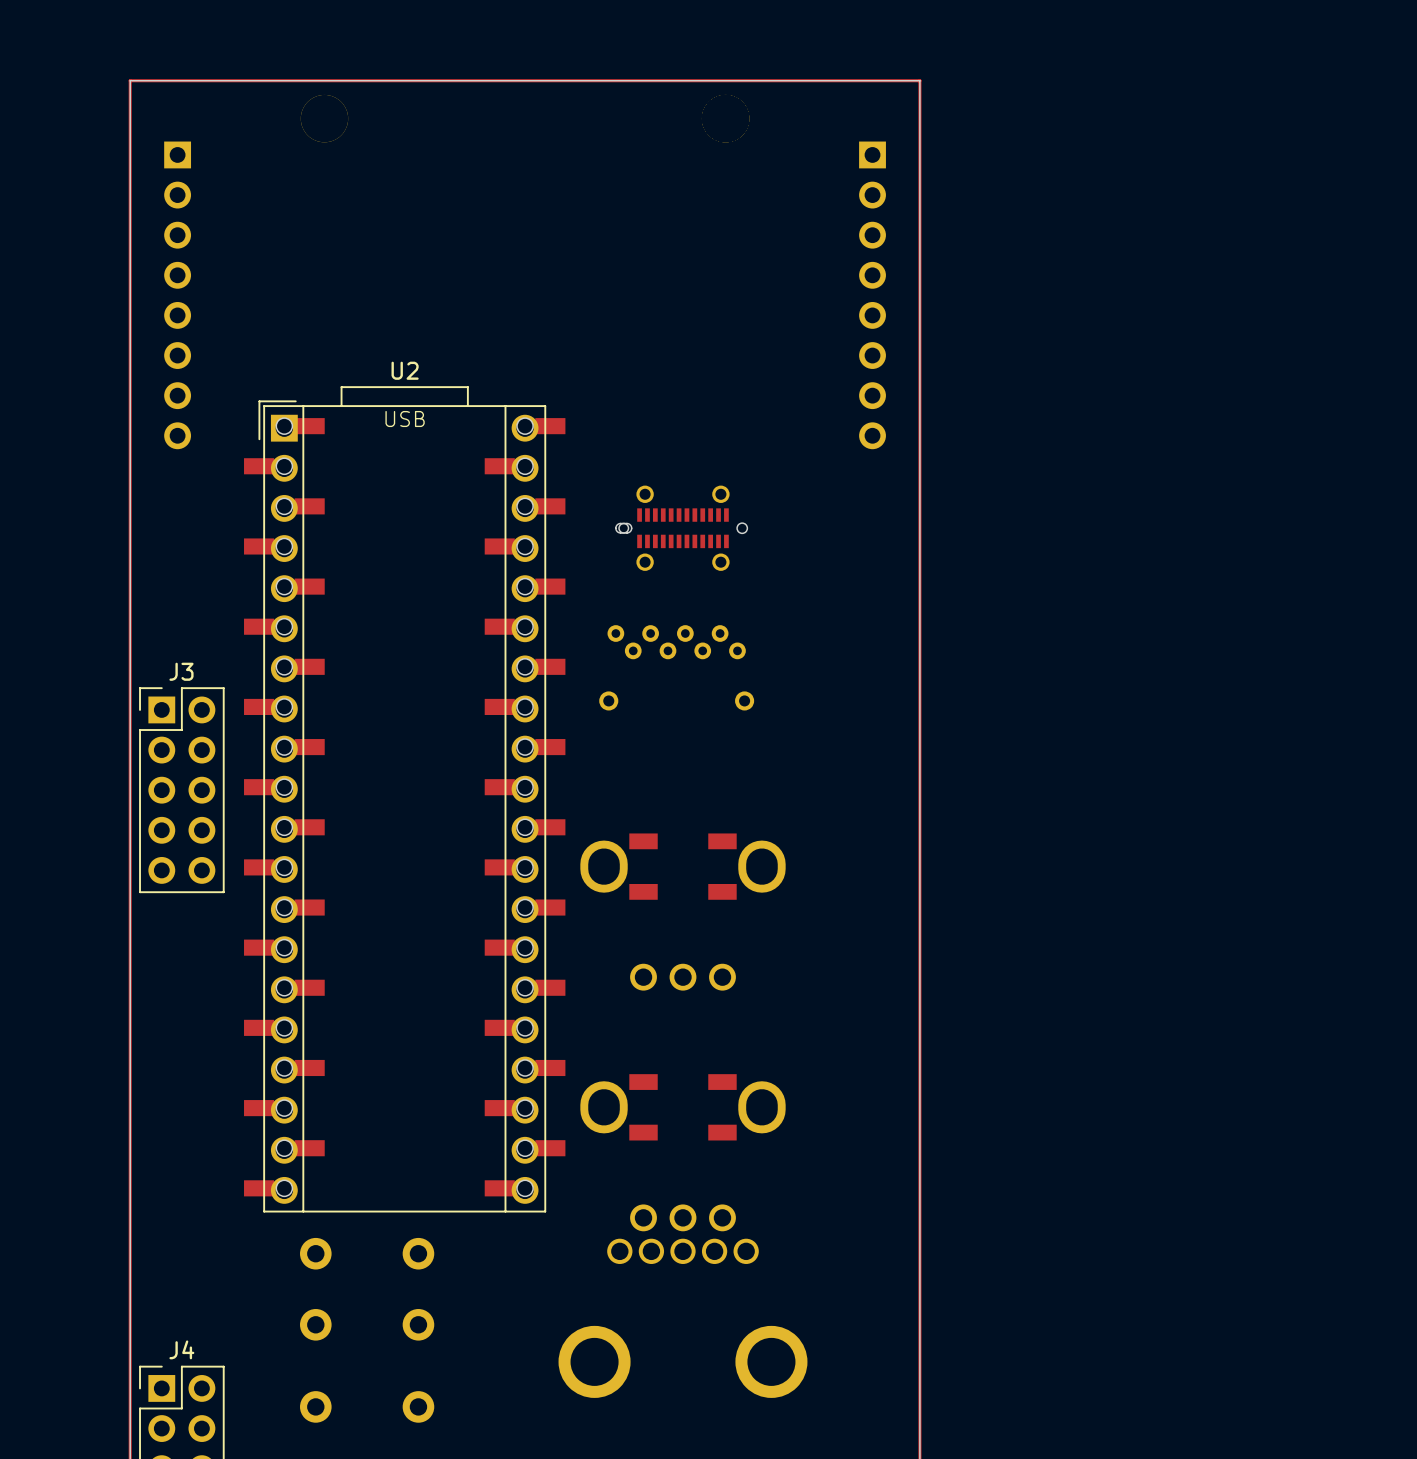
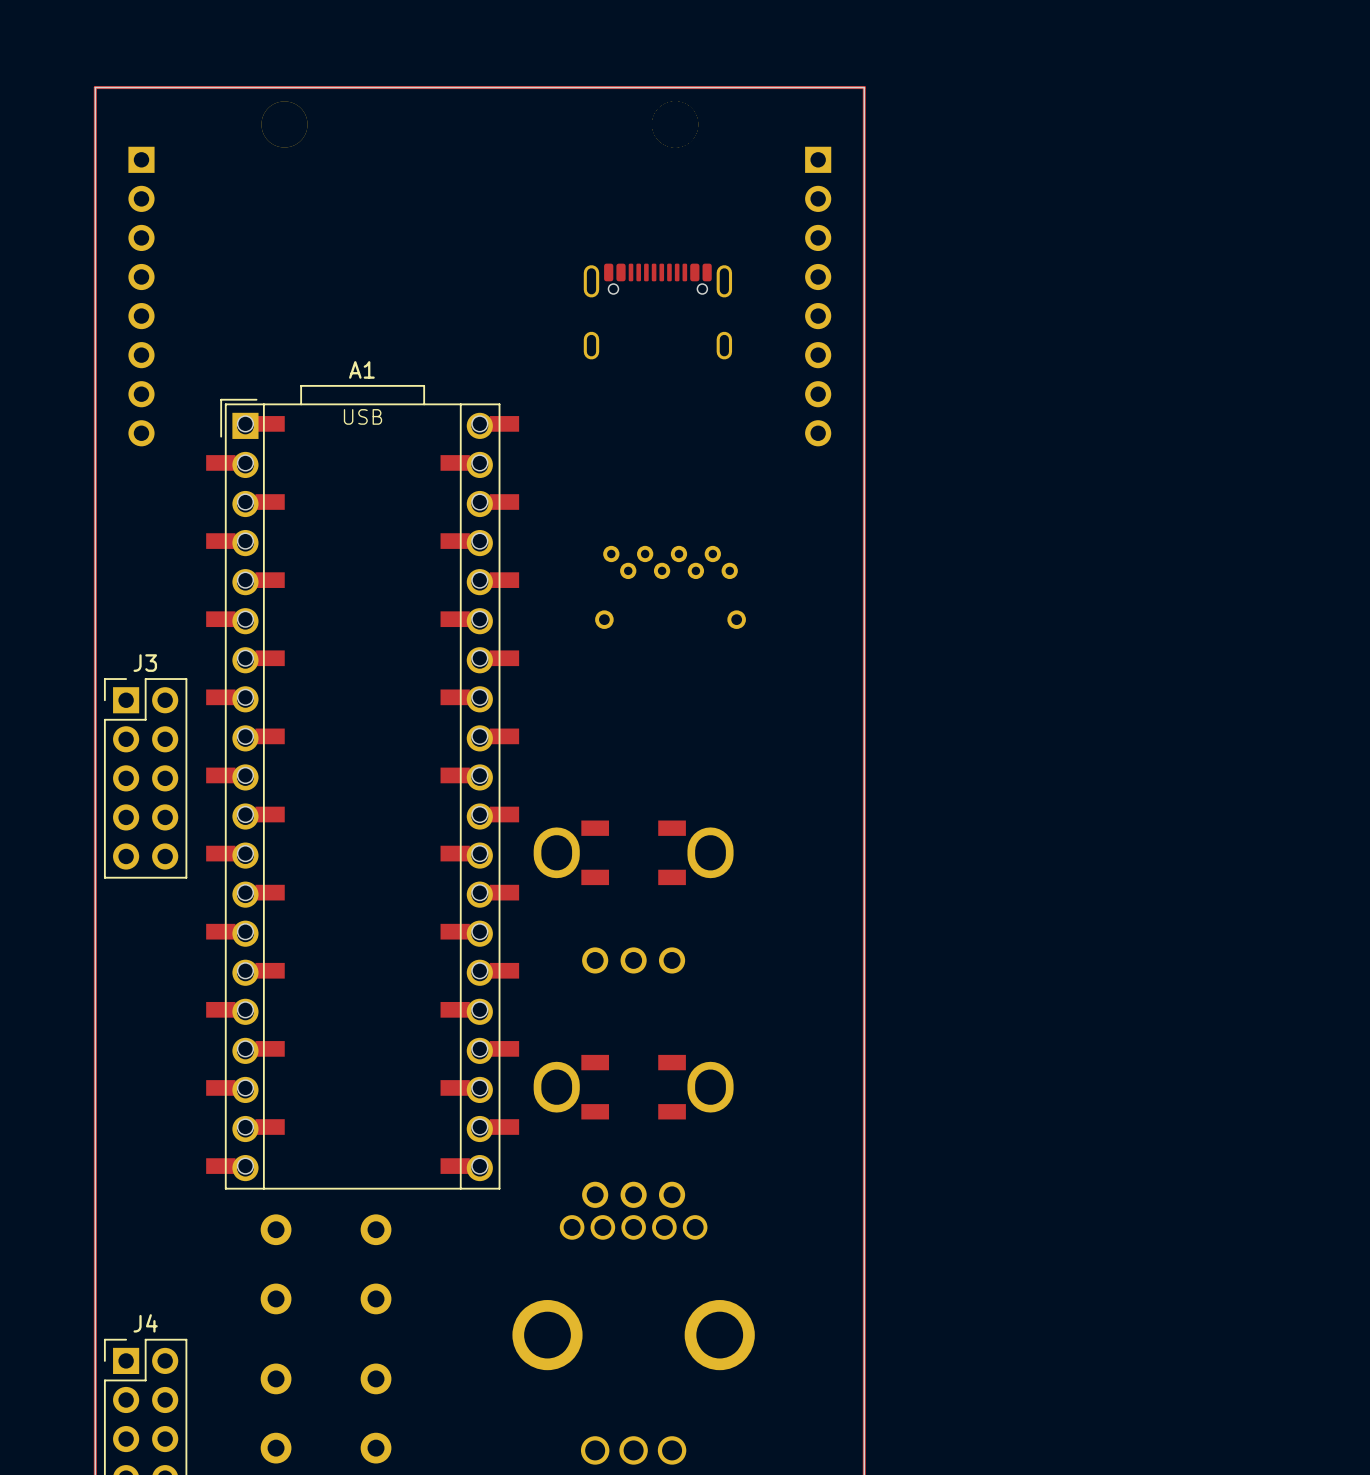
part: none -> (657, 311)
U2 name: U2 (405, 370) -> A1 (361, 369)
part: (681, 528) -> none
part position: (676, 667) -> (670, 587)

